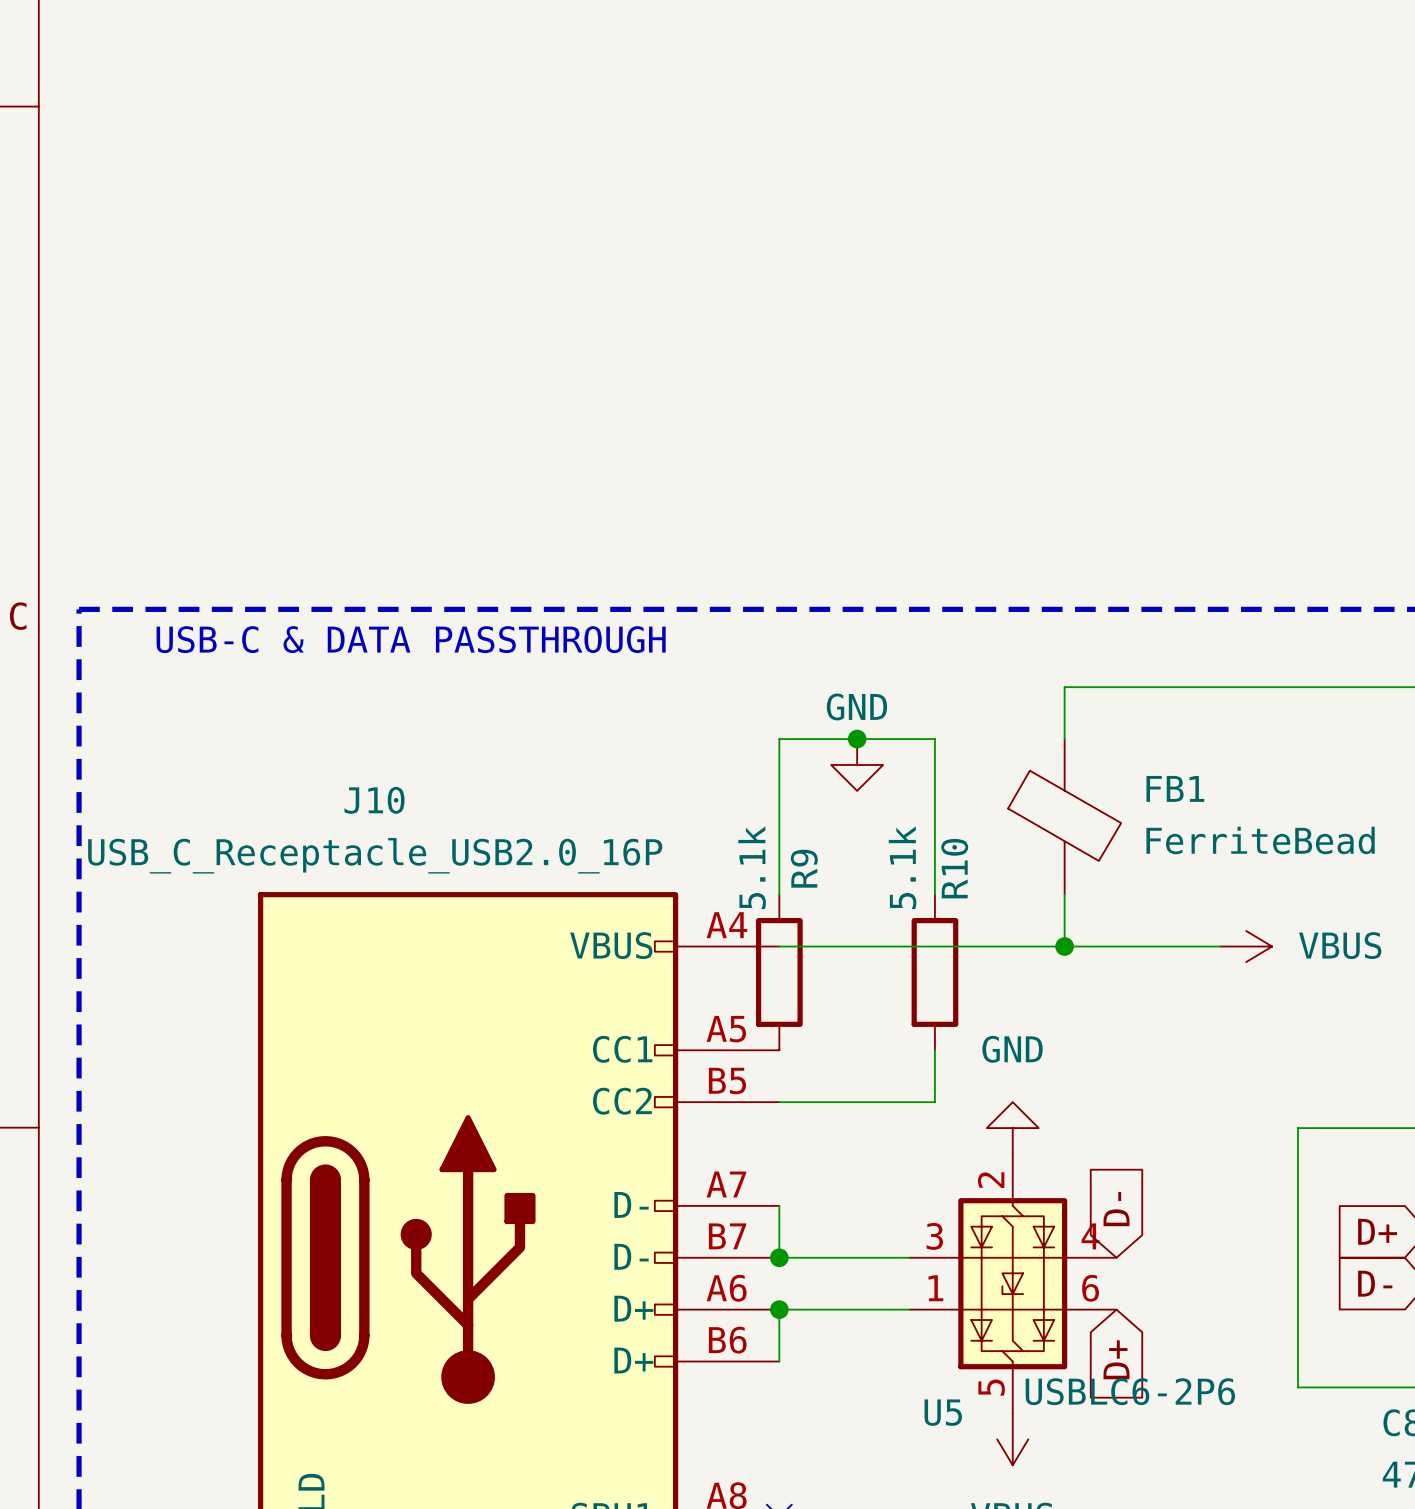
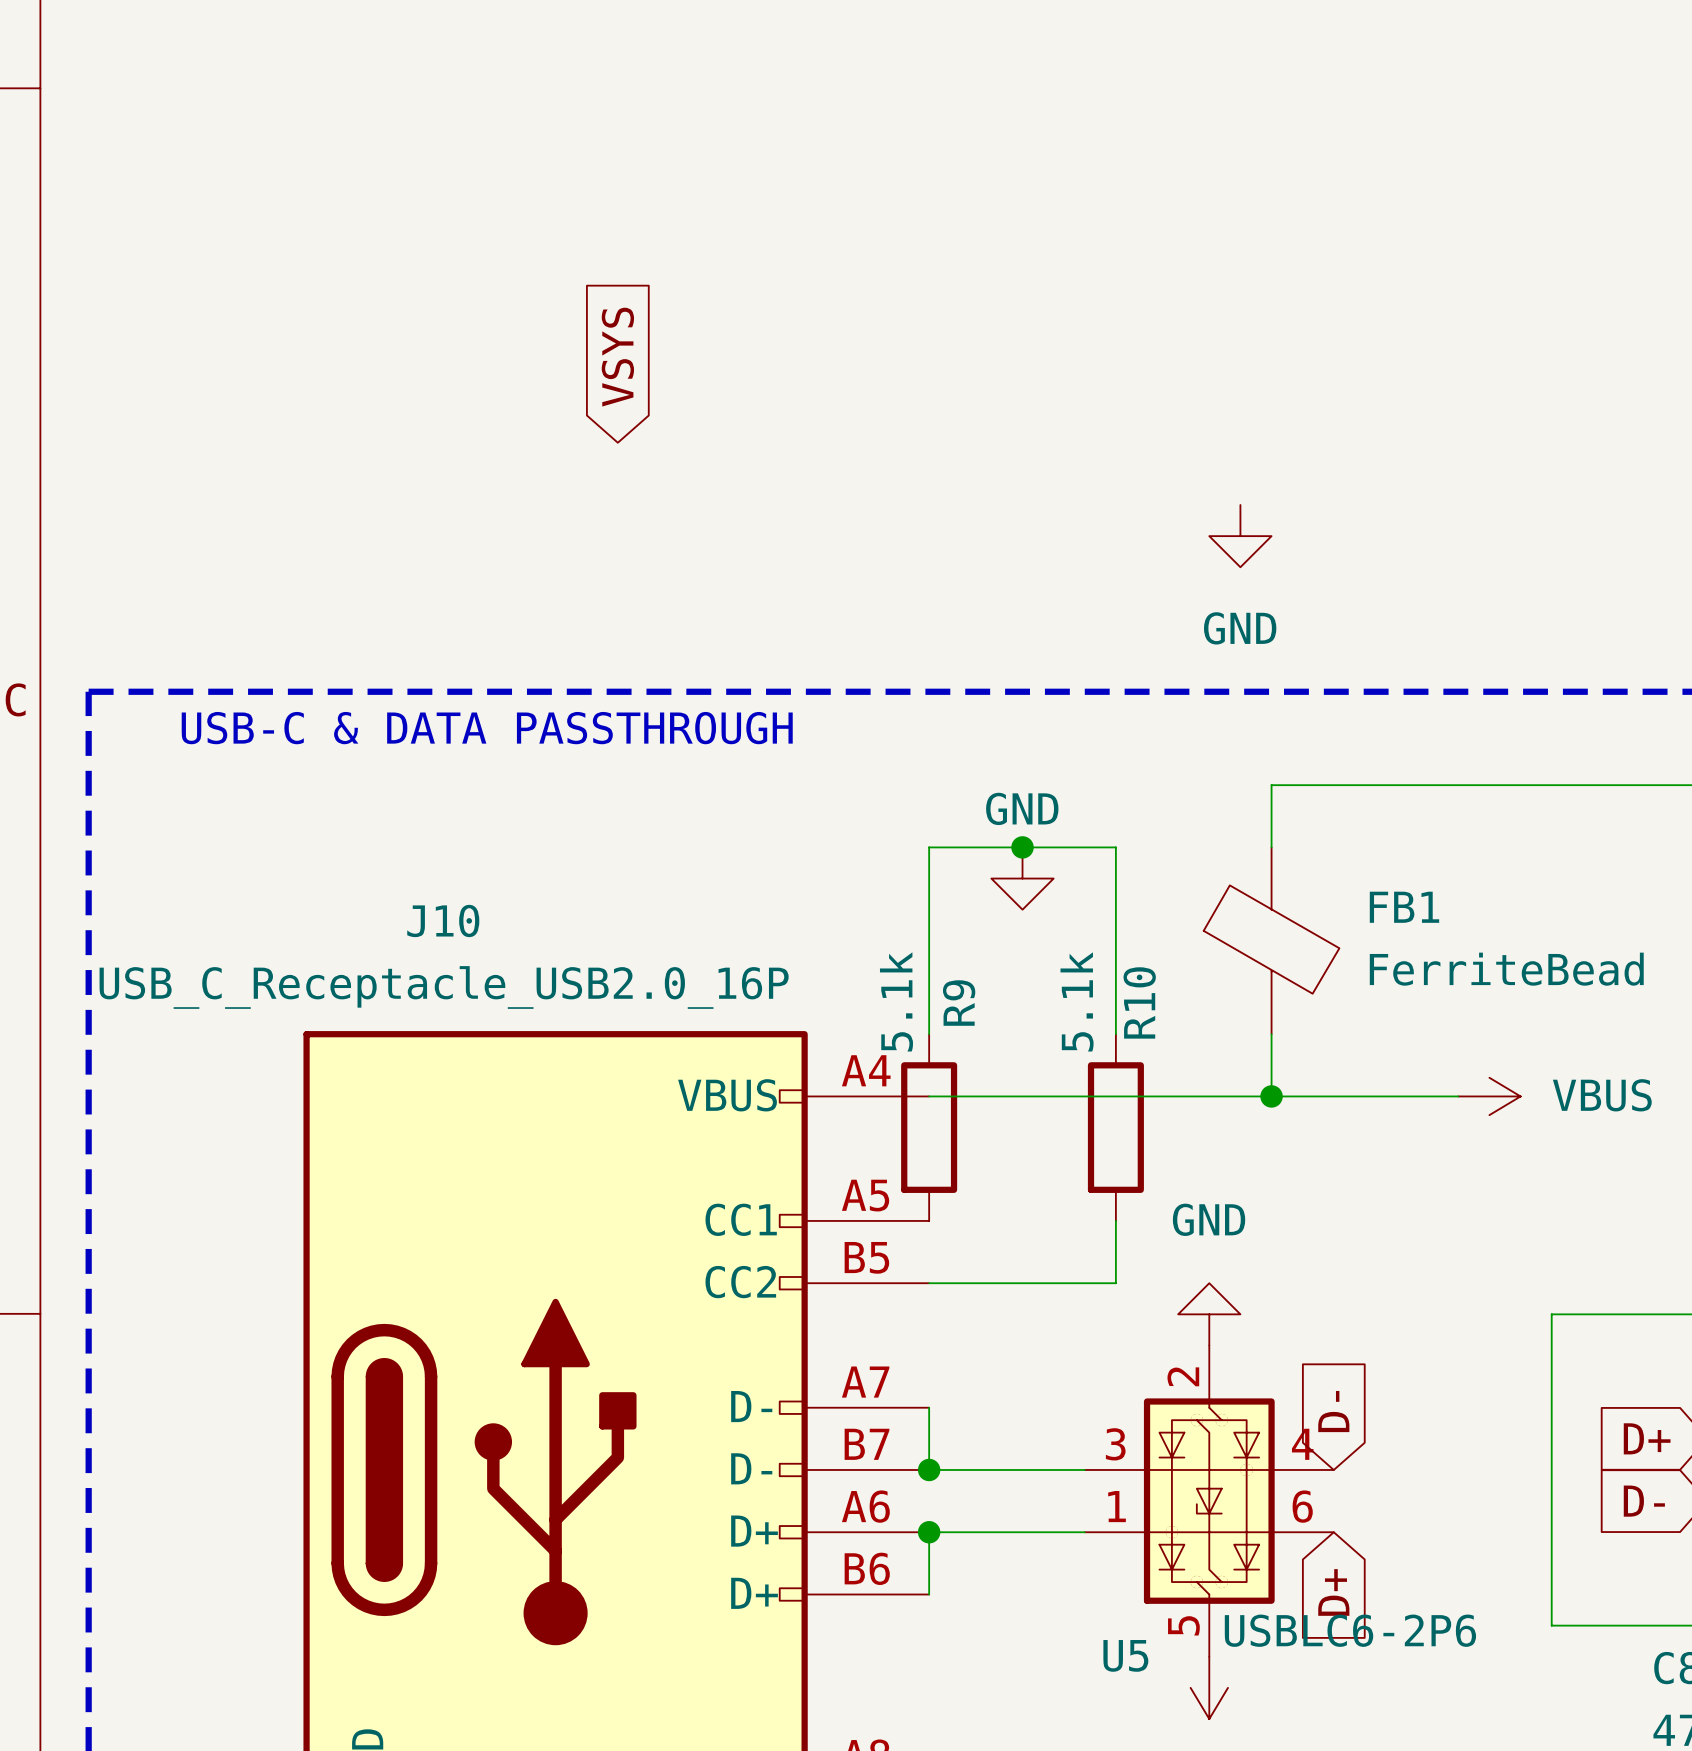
global label: none -> VSYS (617, 357)
power symbol: none -> GND (1240, 536)

